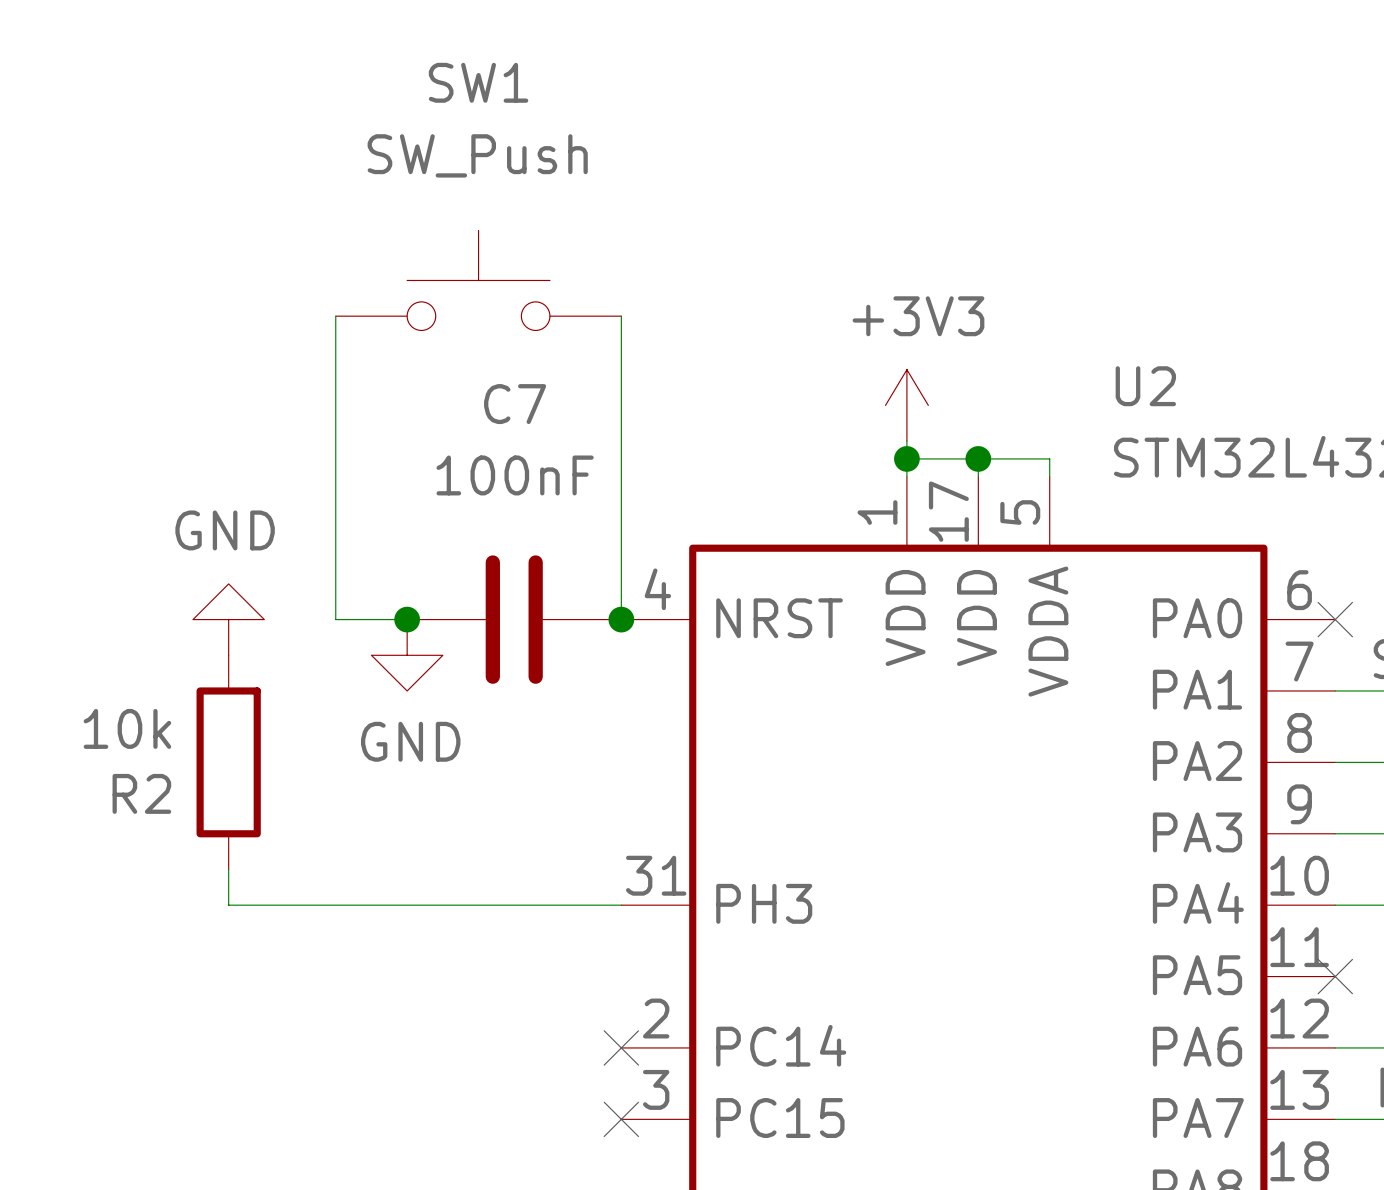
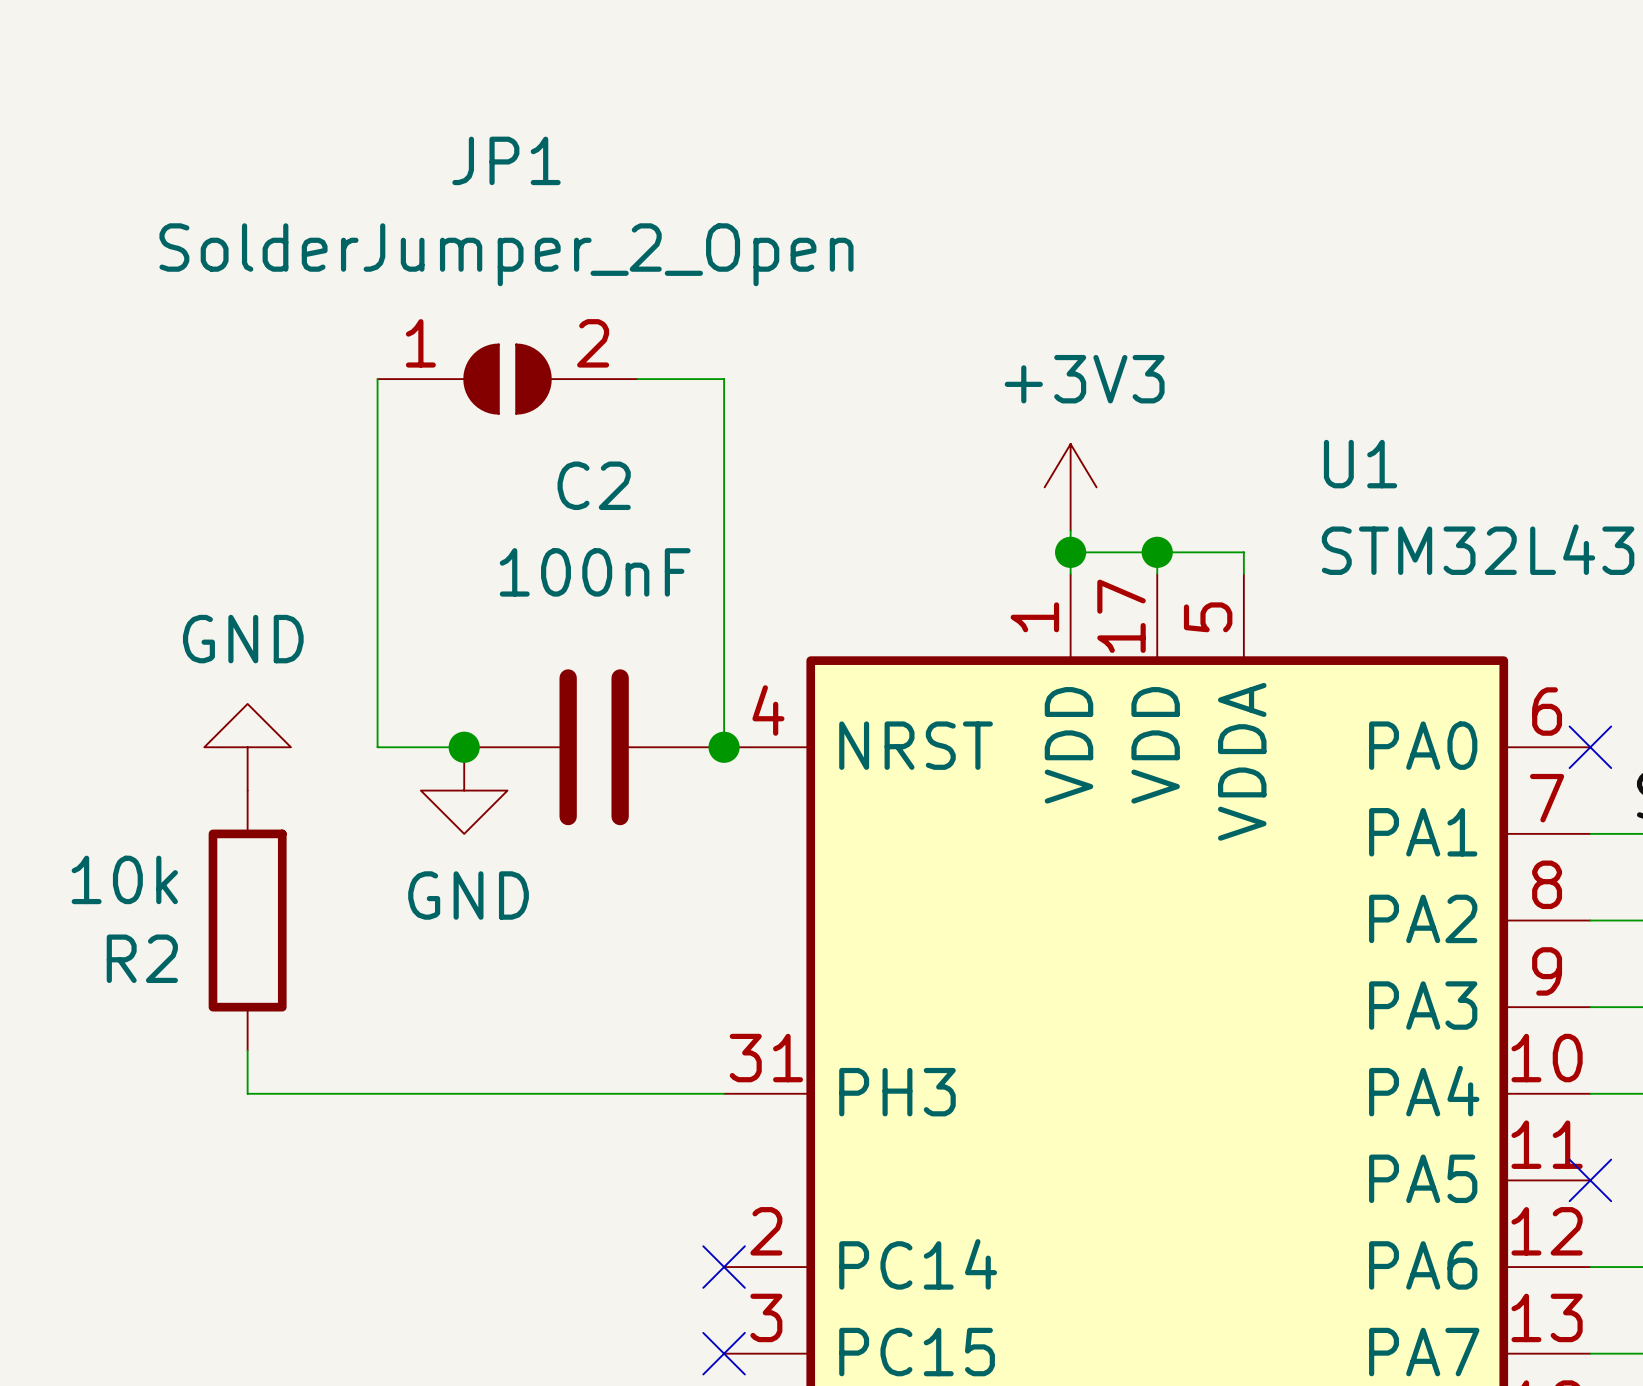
SW1: SW_Push (478, 280) -> none
JP1: none -> SolderJumper_2_Open (507, 379)
U2 name: U2 (1145, 386) -> U1 (1360, 464)
C7 name: C7 (515, 404) -> C2 (594, 485)

